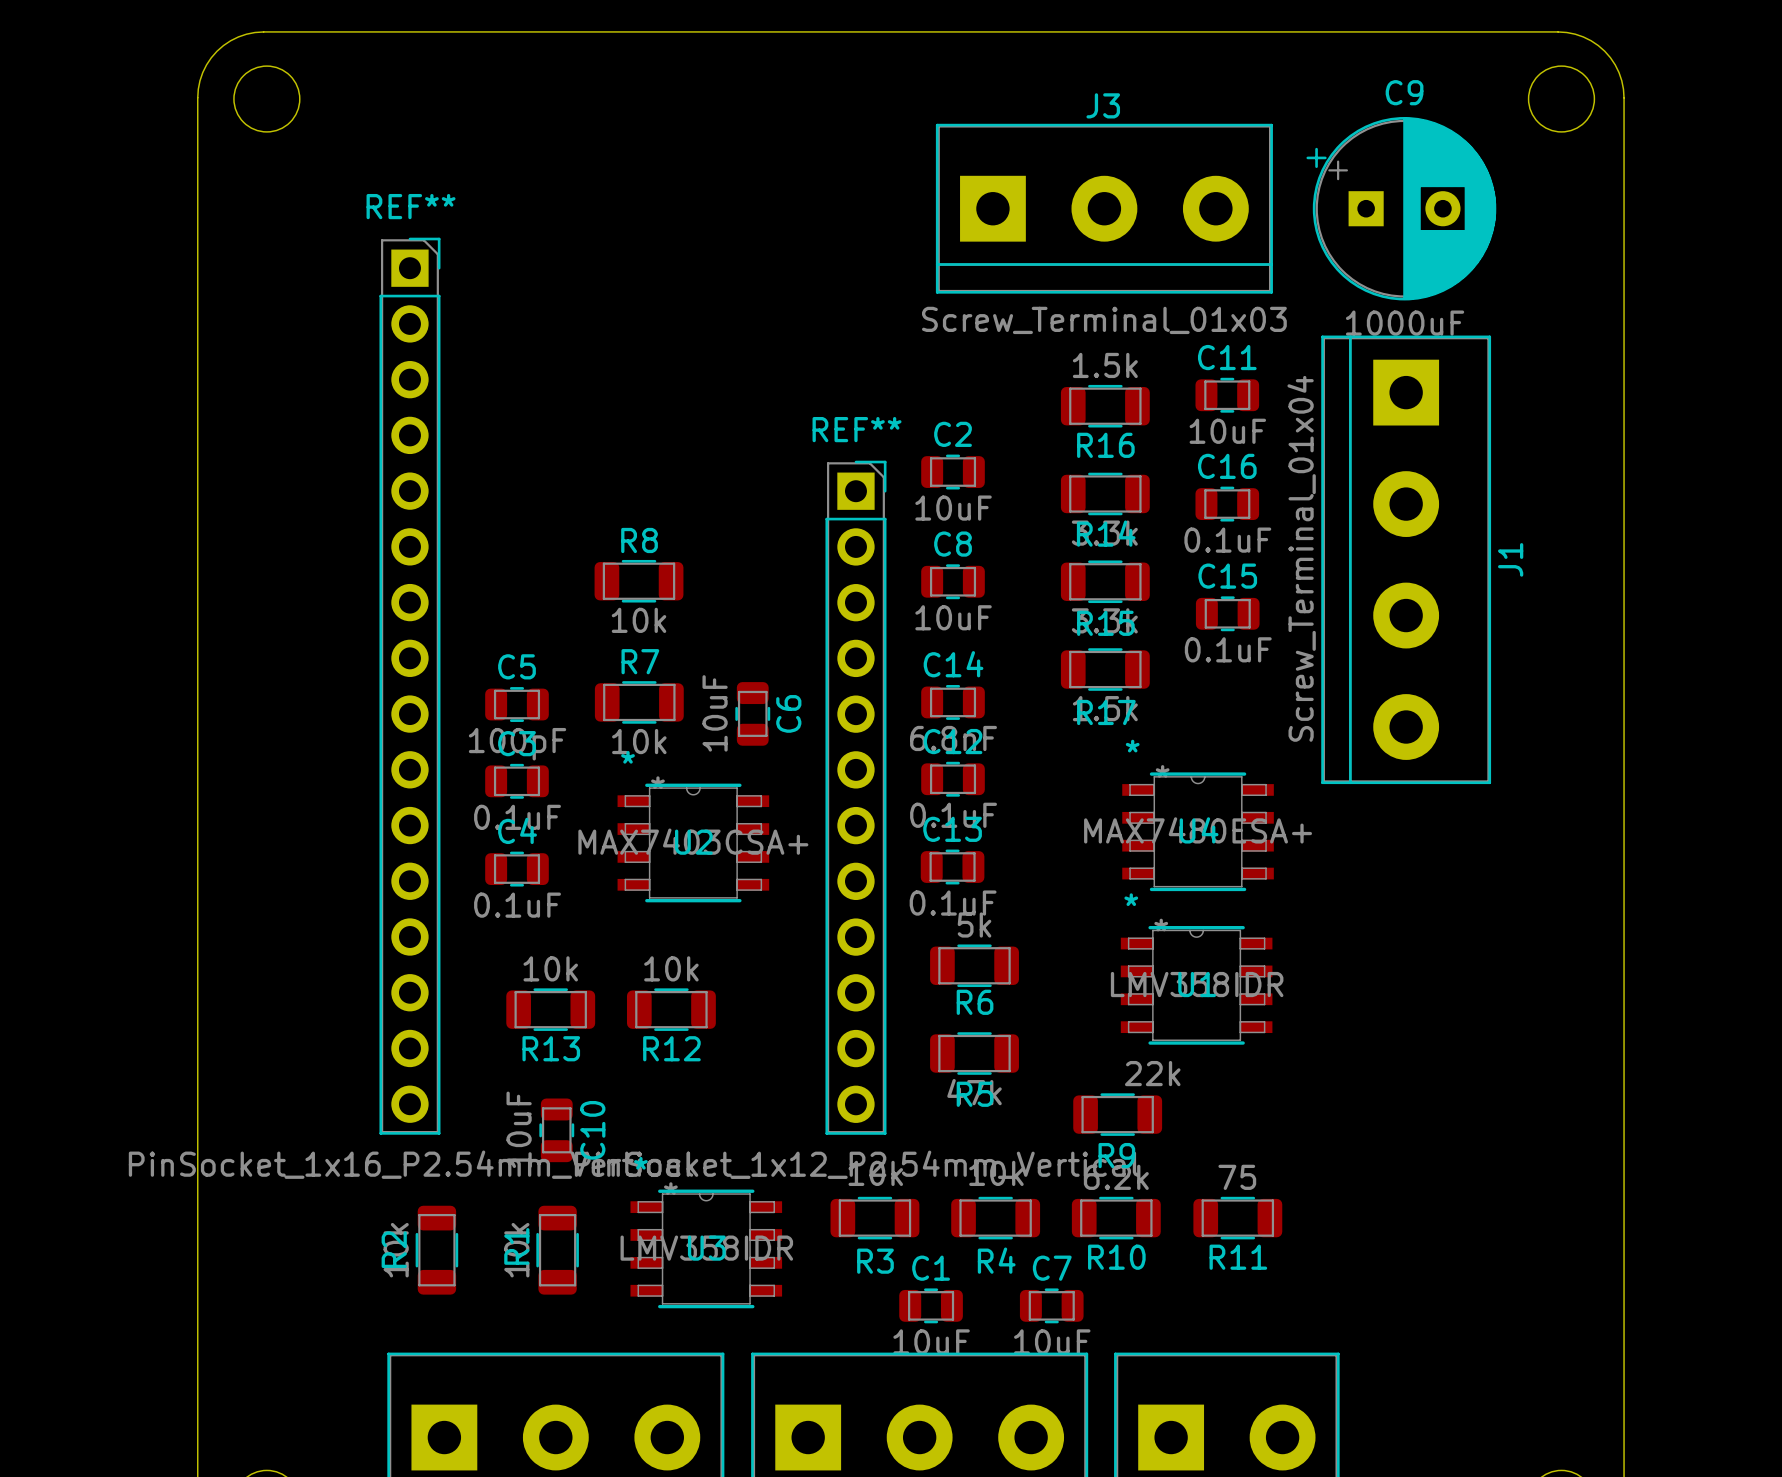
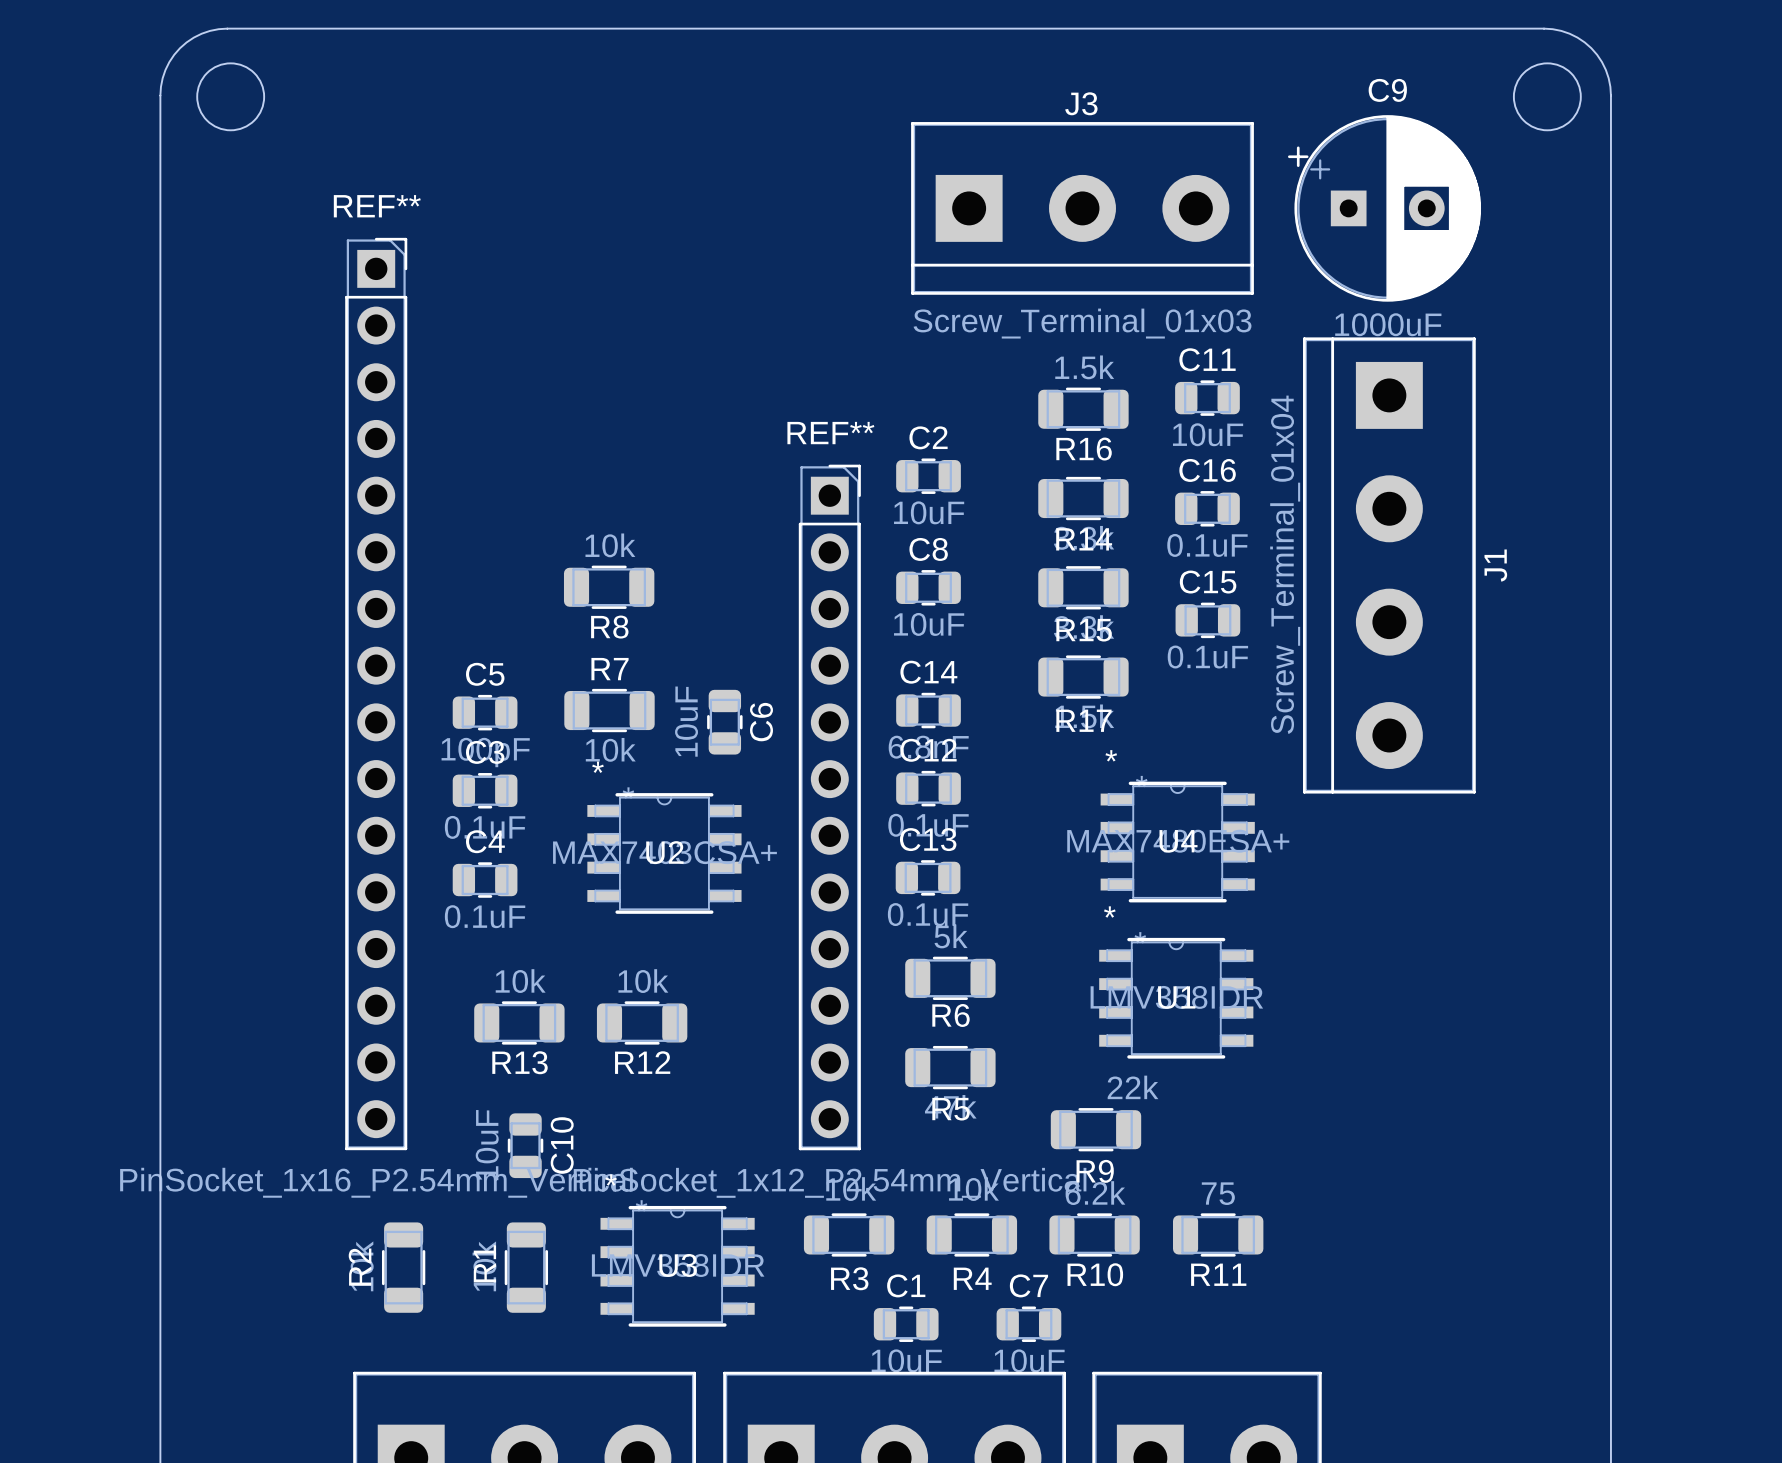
R8 name position: R8 (639, 540) -> R8 (609, 627)
R8 value position: 10k (639, 620) -> 10k (610, 545)

